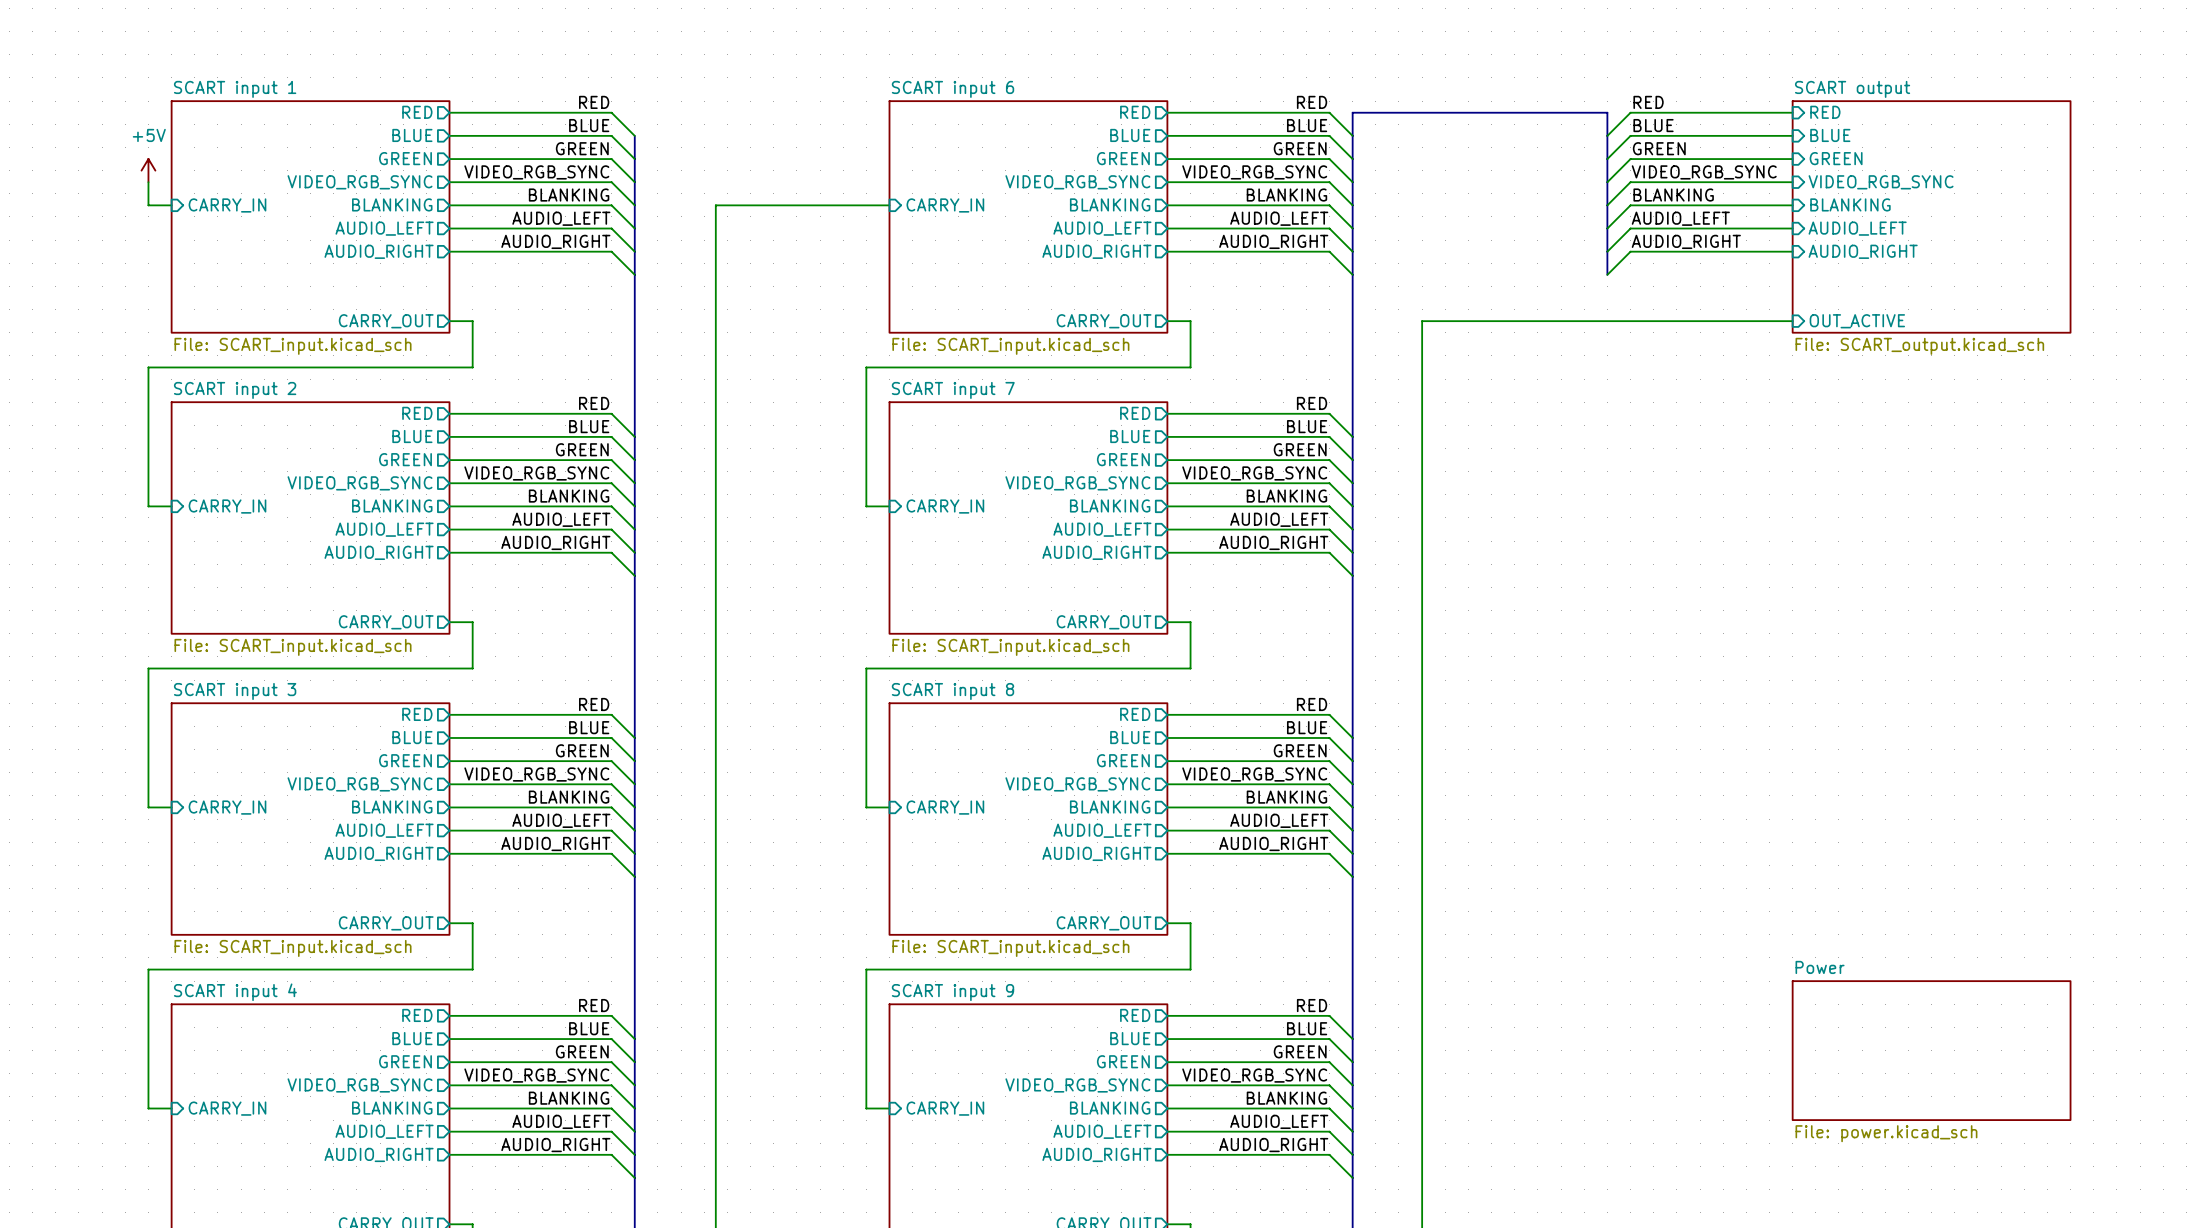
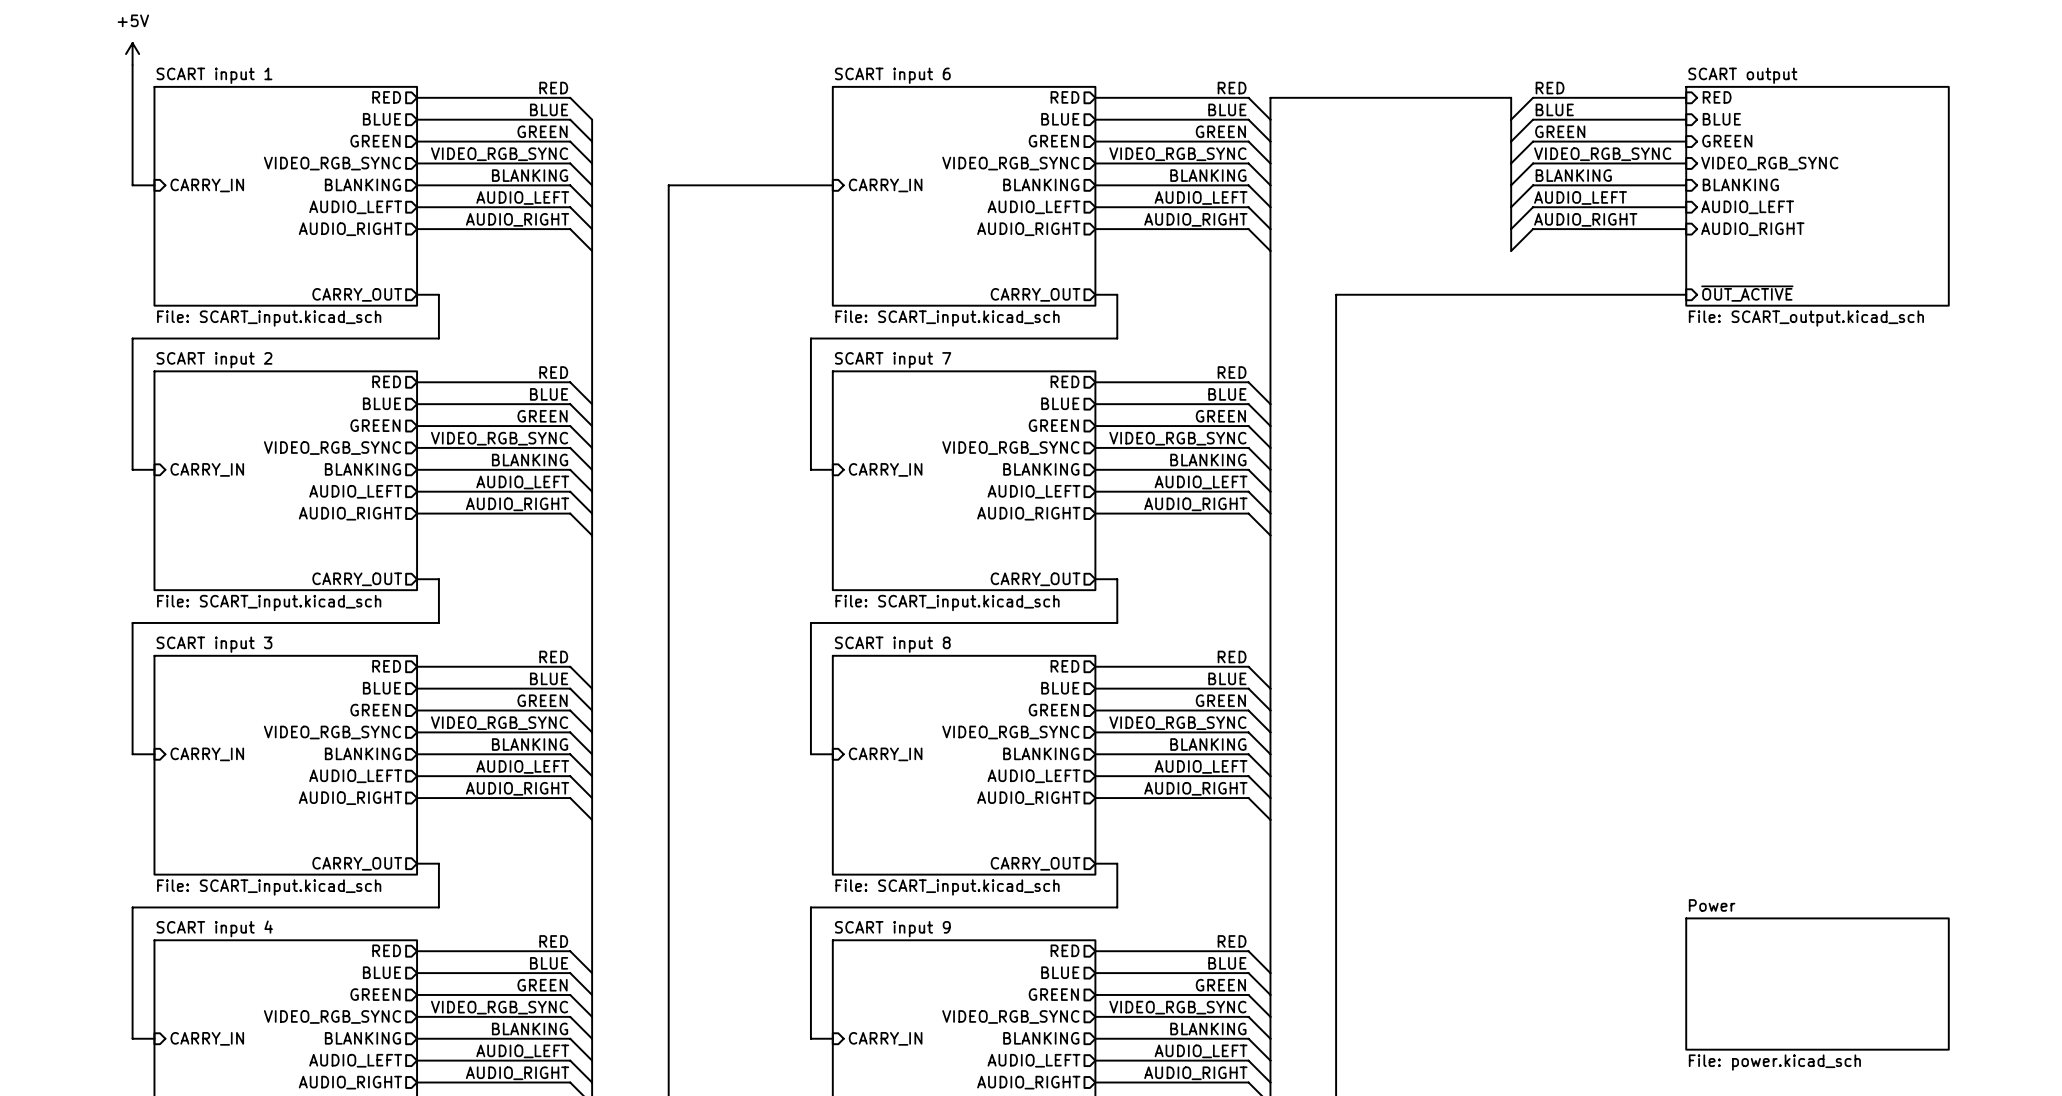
wire: none -> (132, 64) (132, 163)
power symbol position: +5V (148, 170) -> +5V (132, 54)
sheet pin: OUT_ACTIVE (1857, 321) -> ~{OUT_ACTIVE} (1747, 293)

